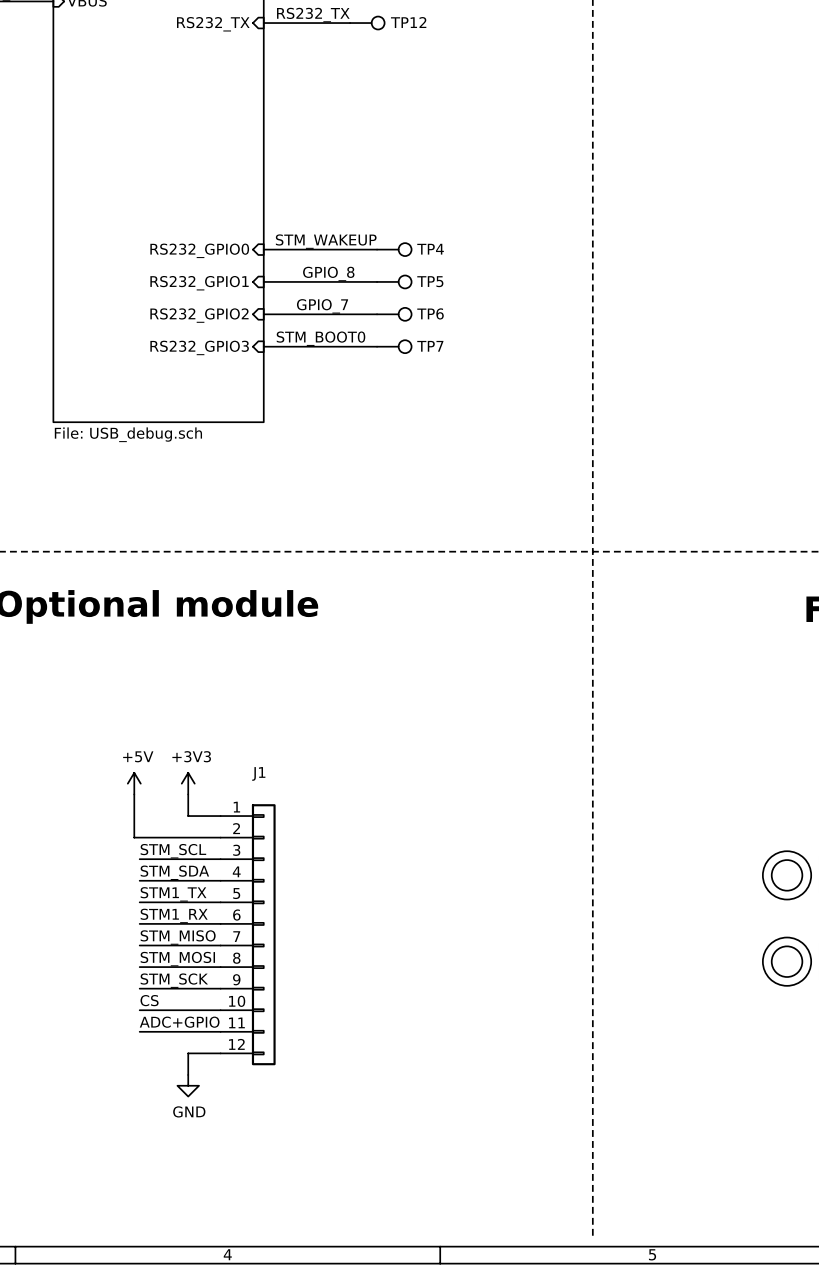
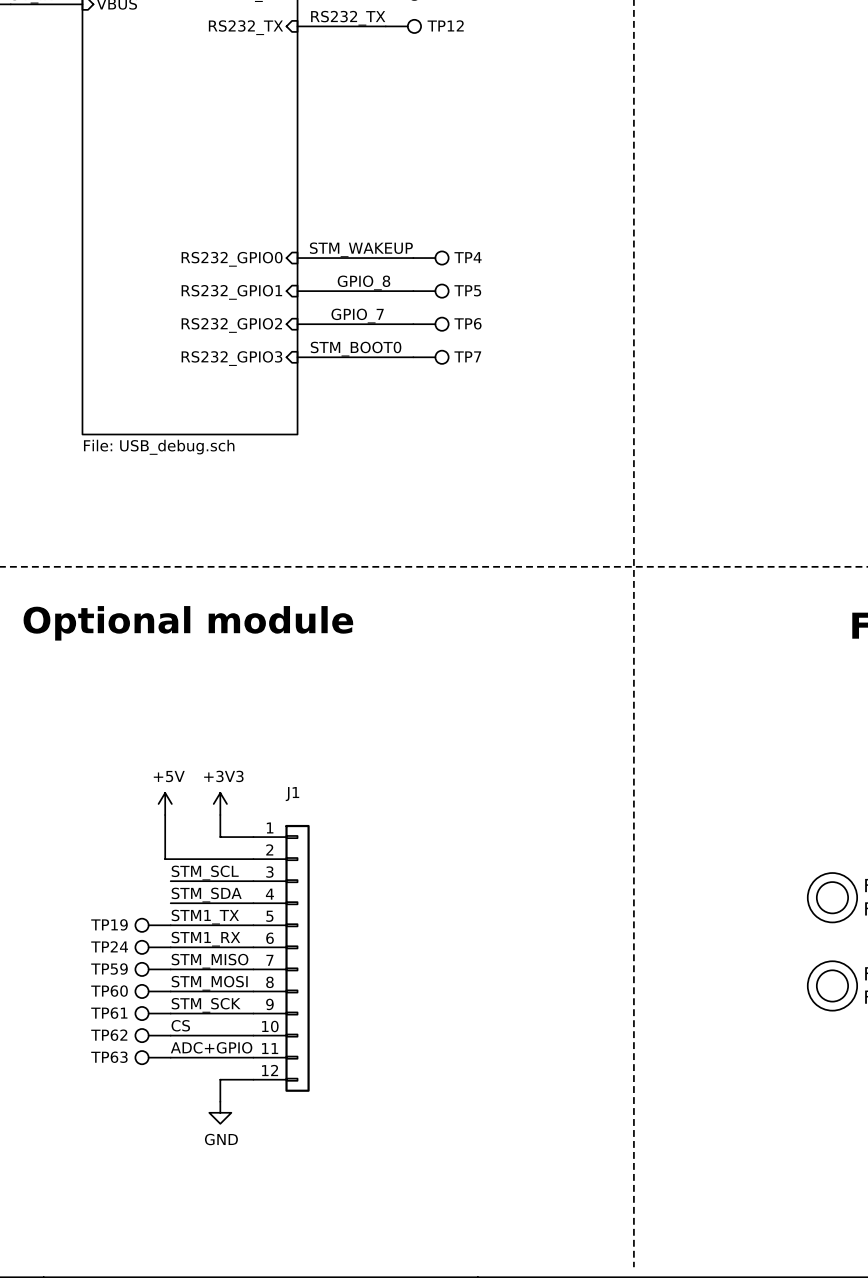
TP19: none -> (153, 925)
TP24: none -> (153, 947)
TP59: none -> (153, 969)
TP60: none -> (153, 991)
TP61: none -> (153, 1013)
TP62: none -> (153, 1035)
TP63: none -> (153, 1057)

